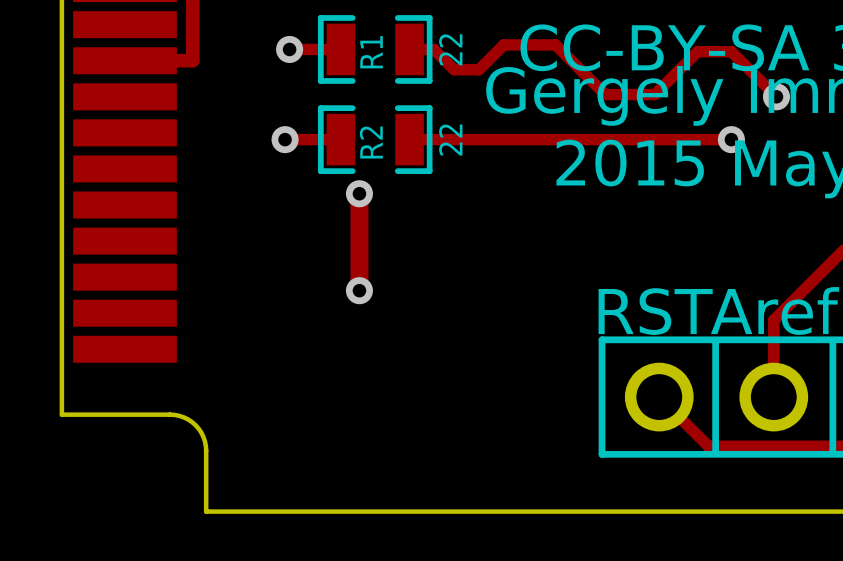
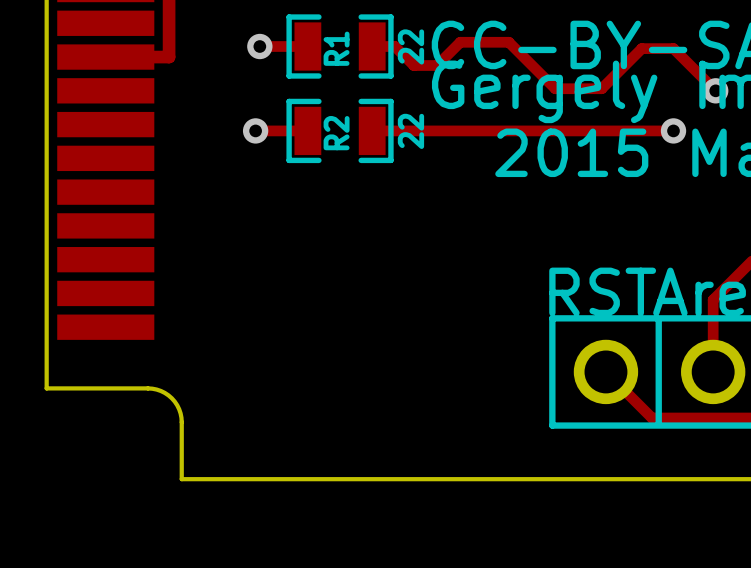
track: (359, 193) (359, 290) -> none
via: (359, 193) -> none
via: (359, 290) -> none

